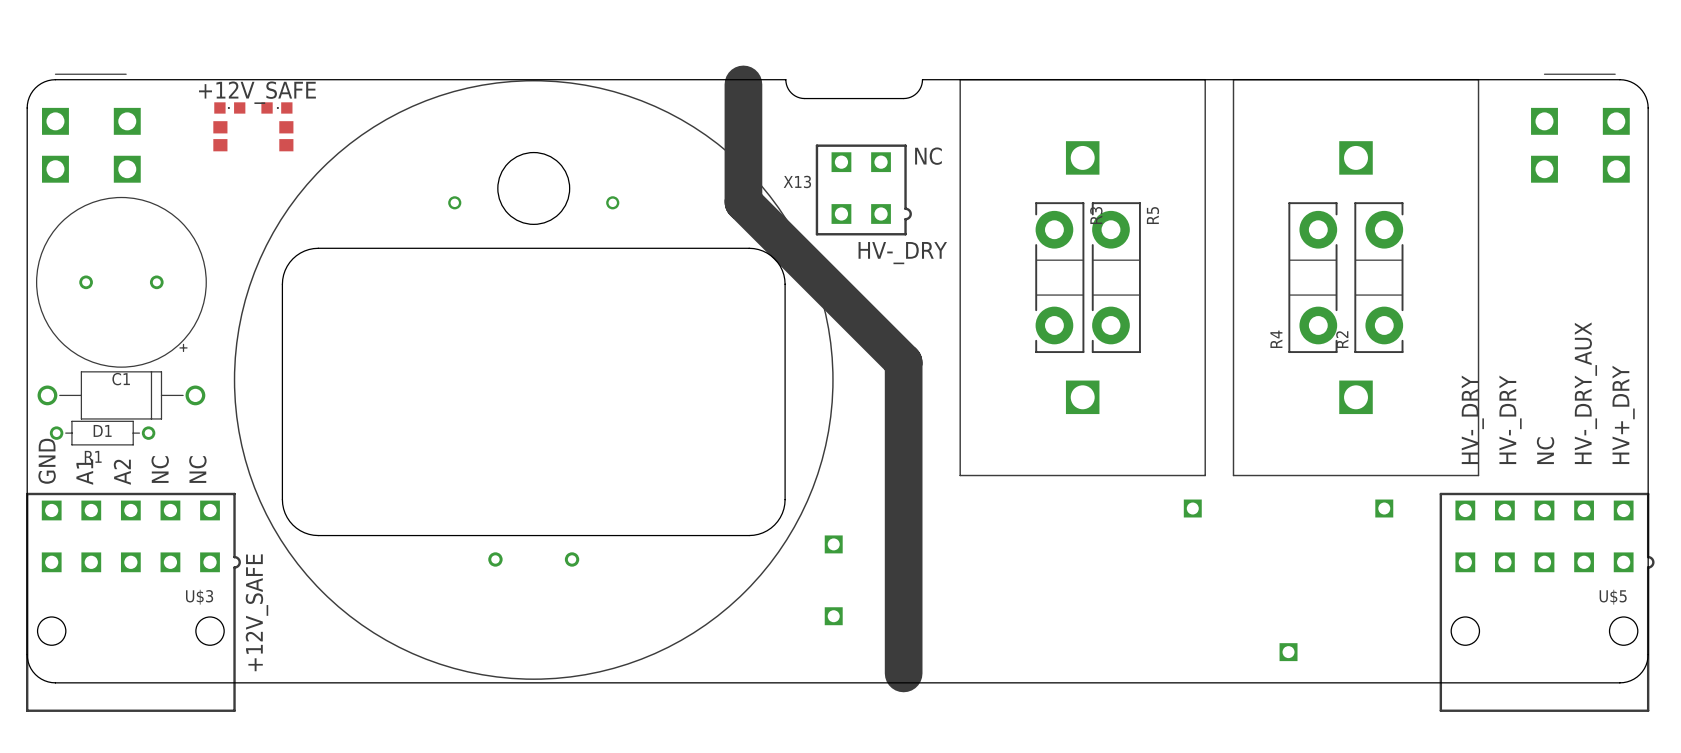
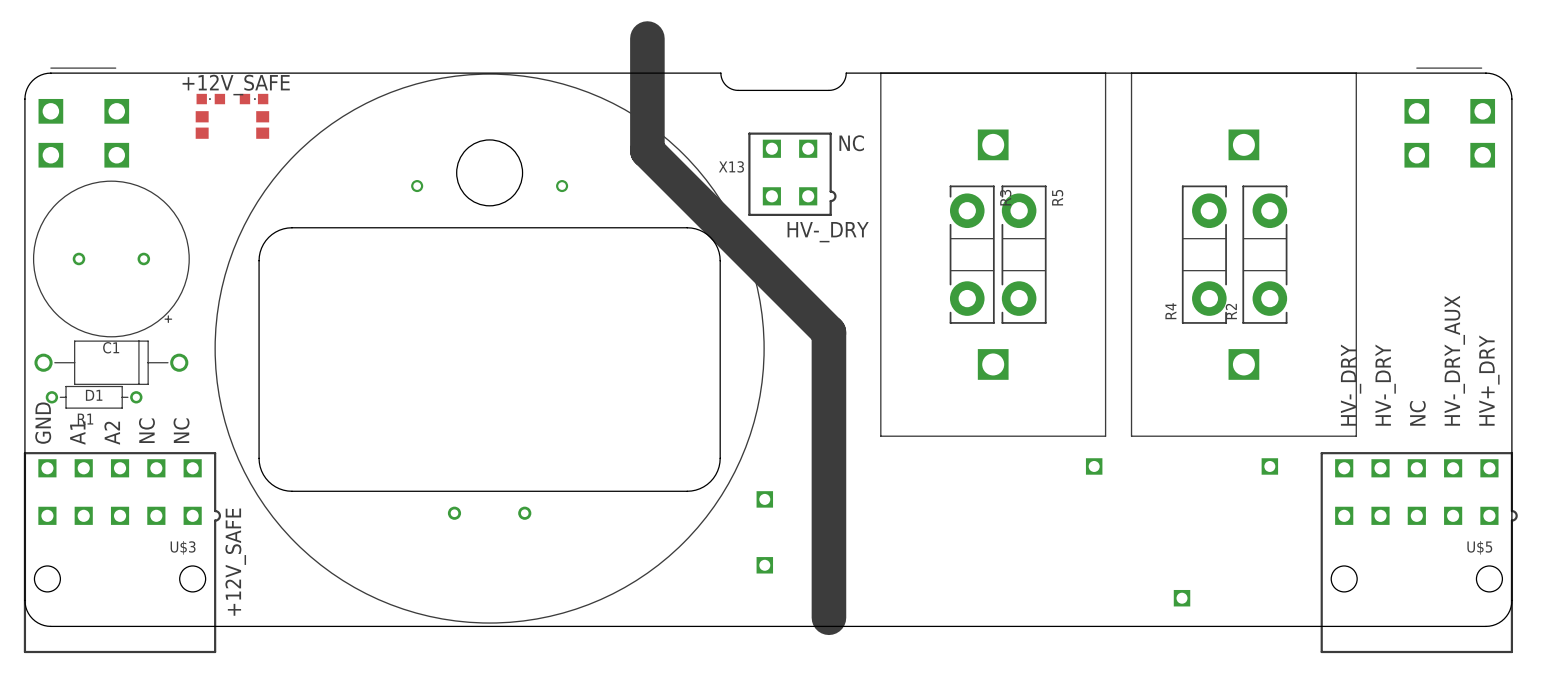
line: (743, 84) (743, 202) -> (647, 38) (647, 150) (681, 185)

